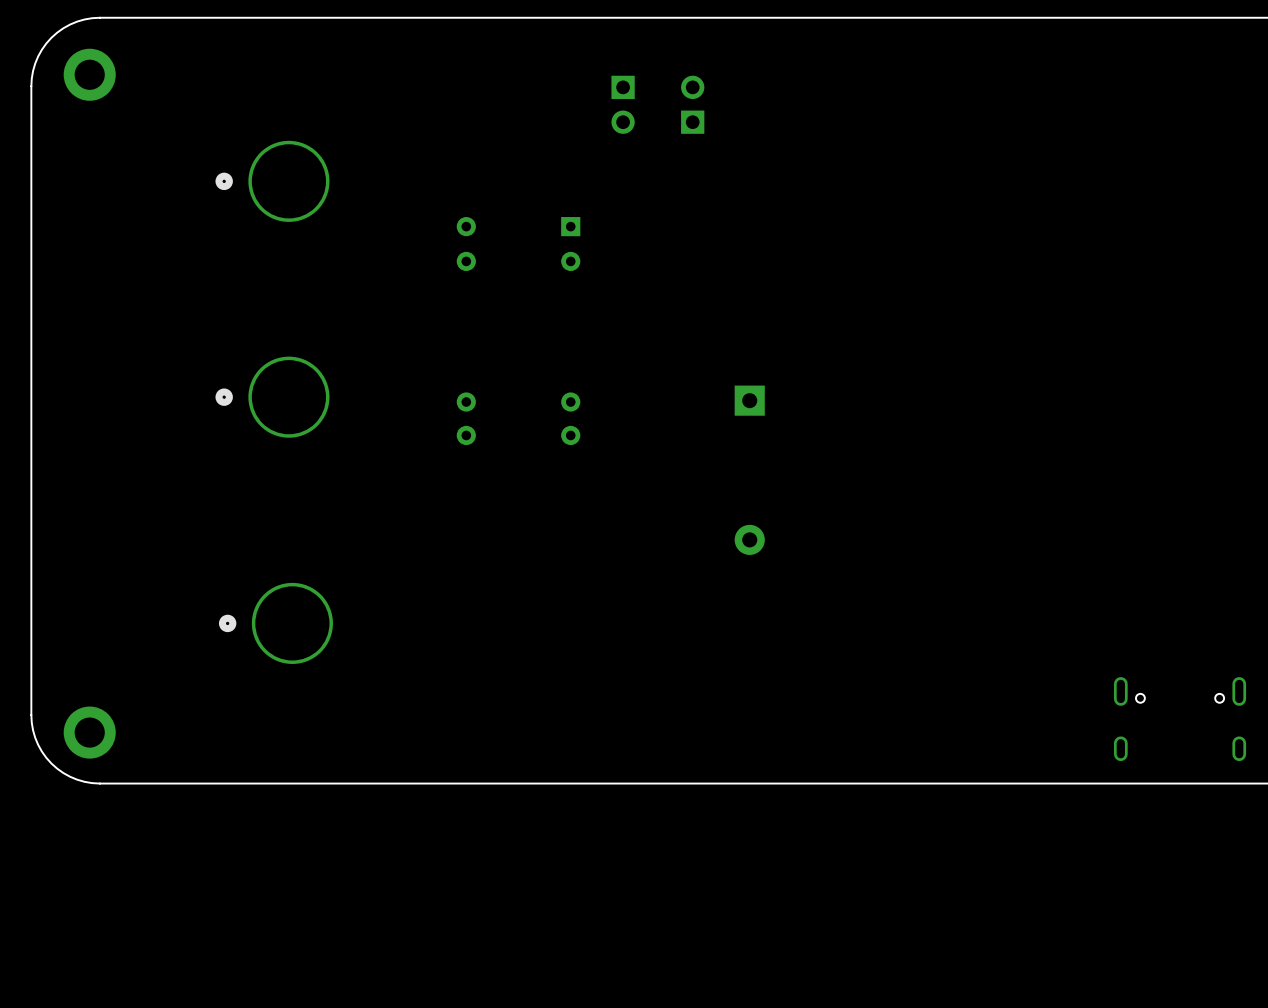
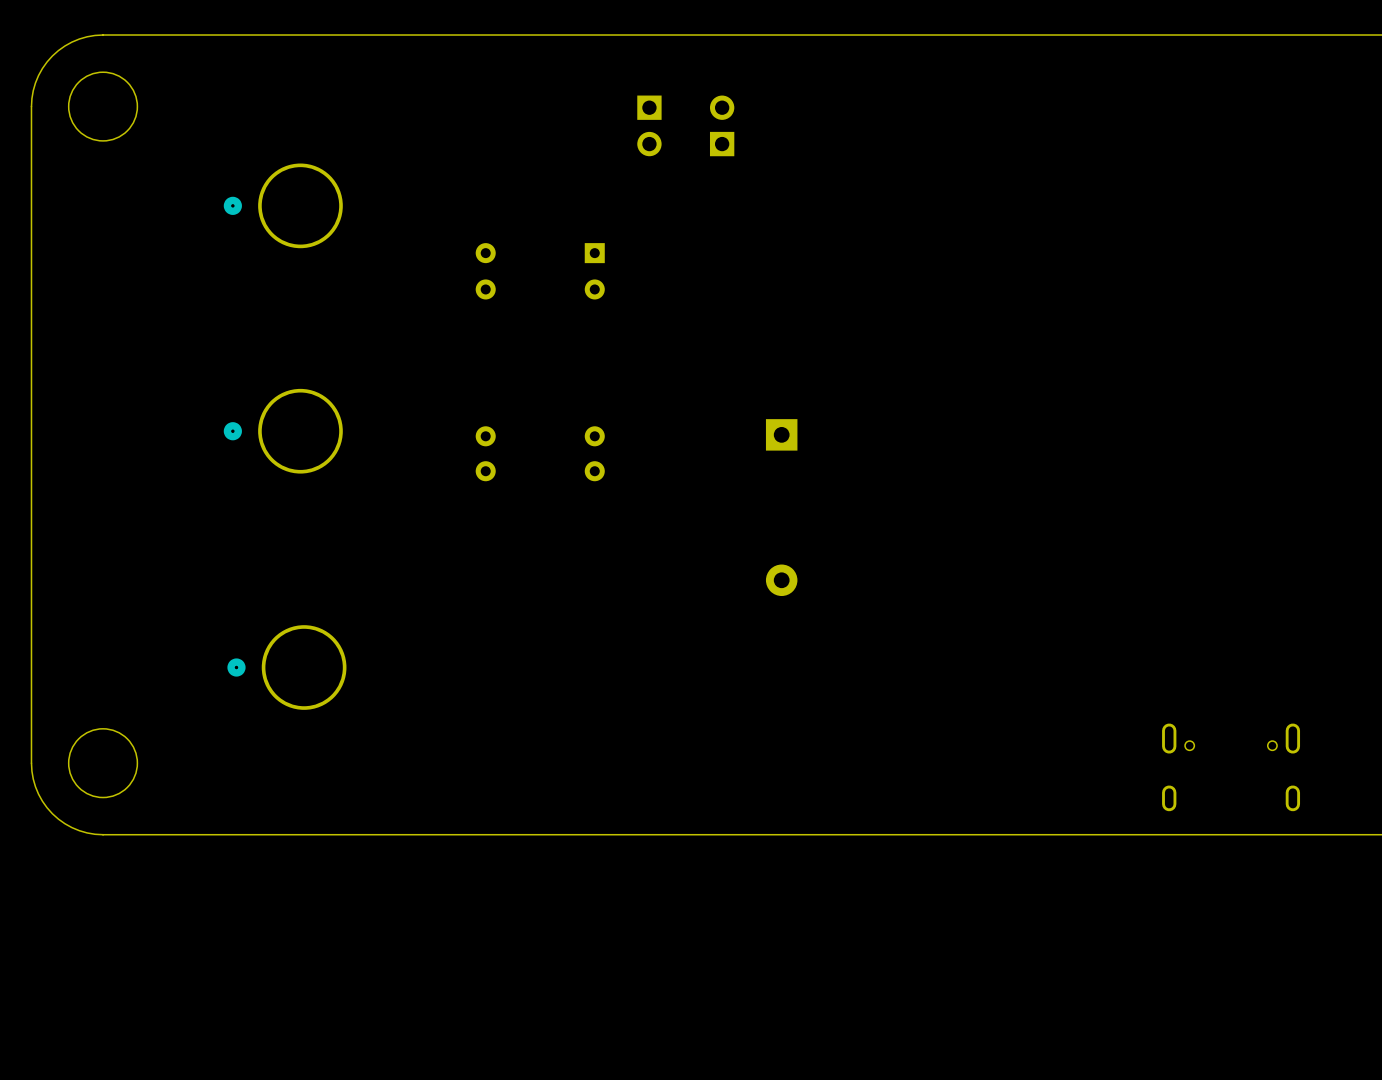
round board edge: none -> [68, 71, 138, 142]
part: (89, 74) -> none
round board edge: none -> [68, 728, 138, 798]
part: (89, 732) -> none

